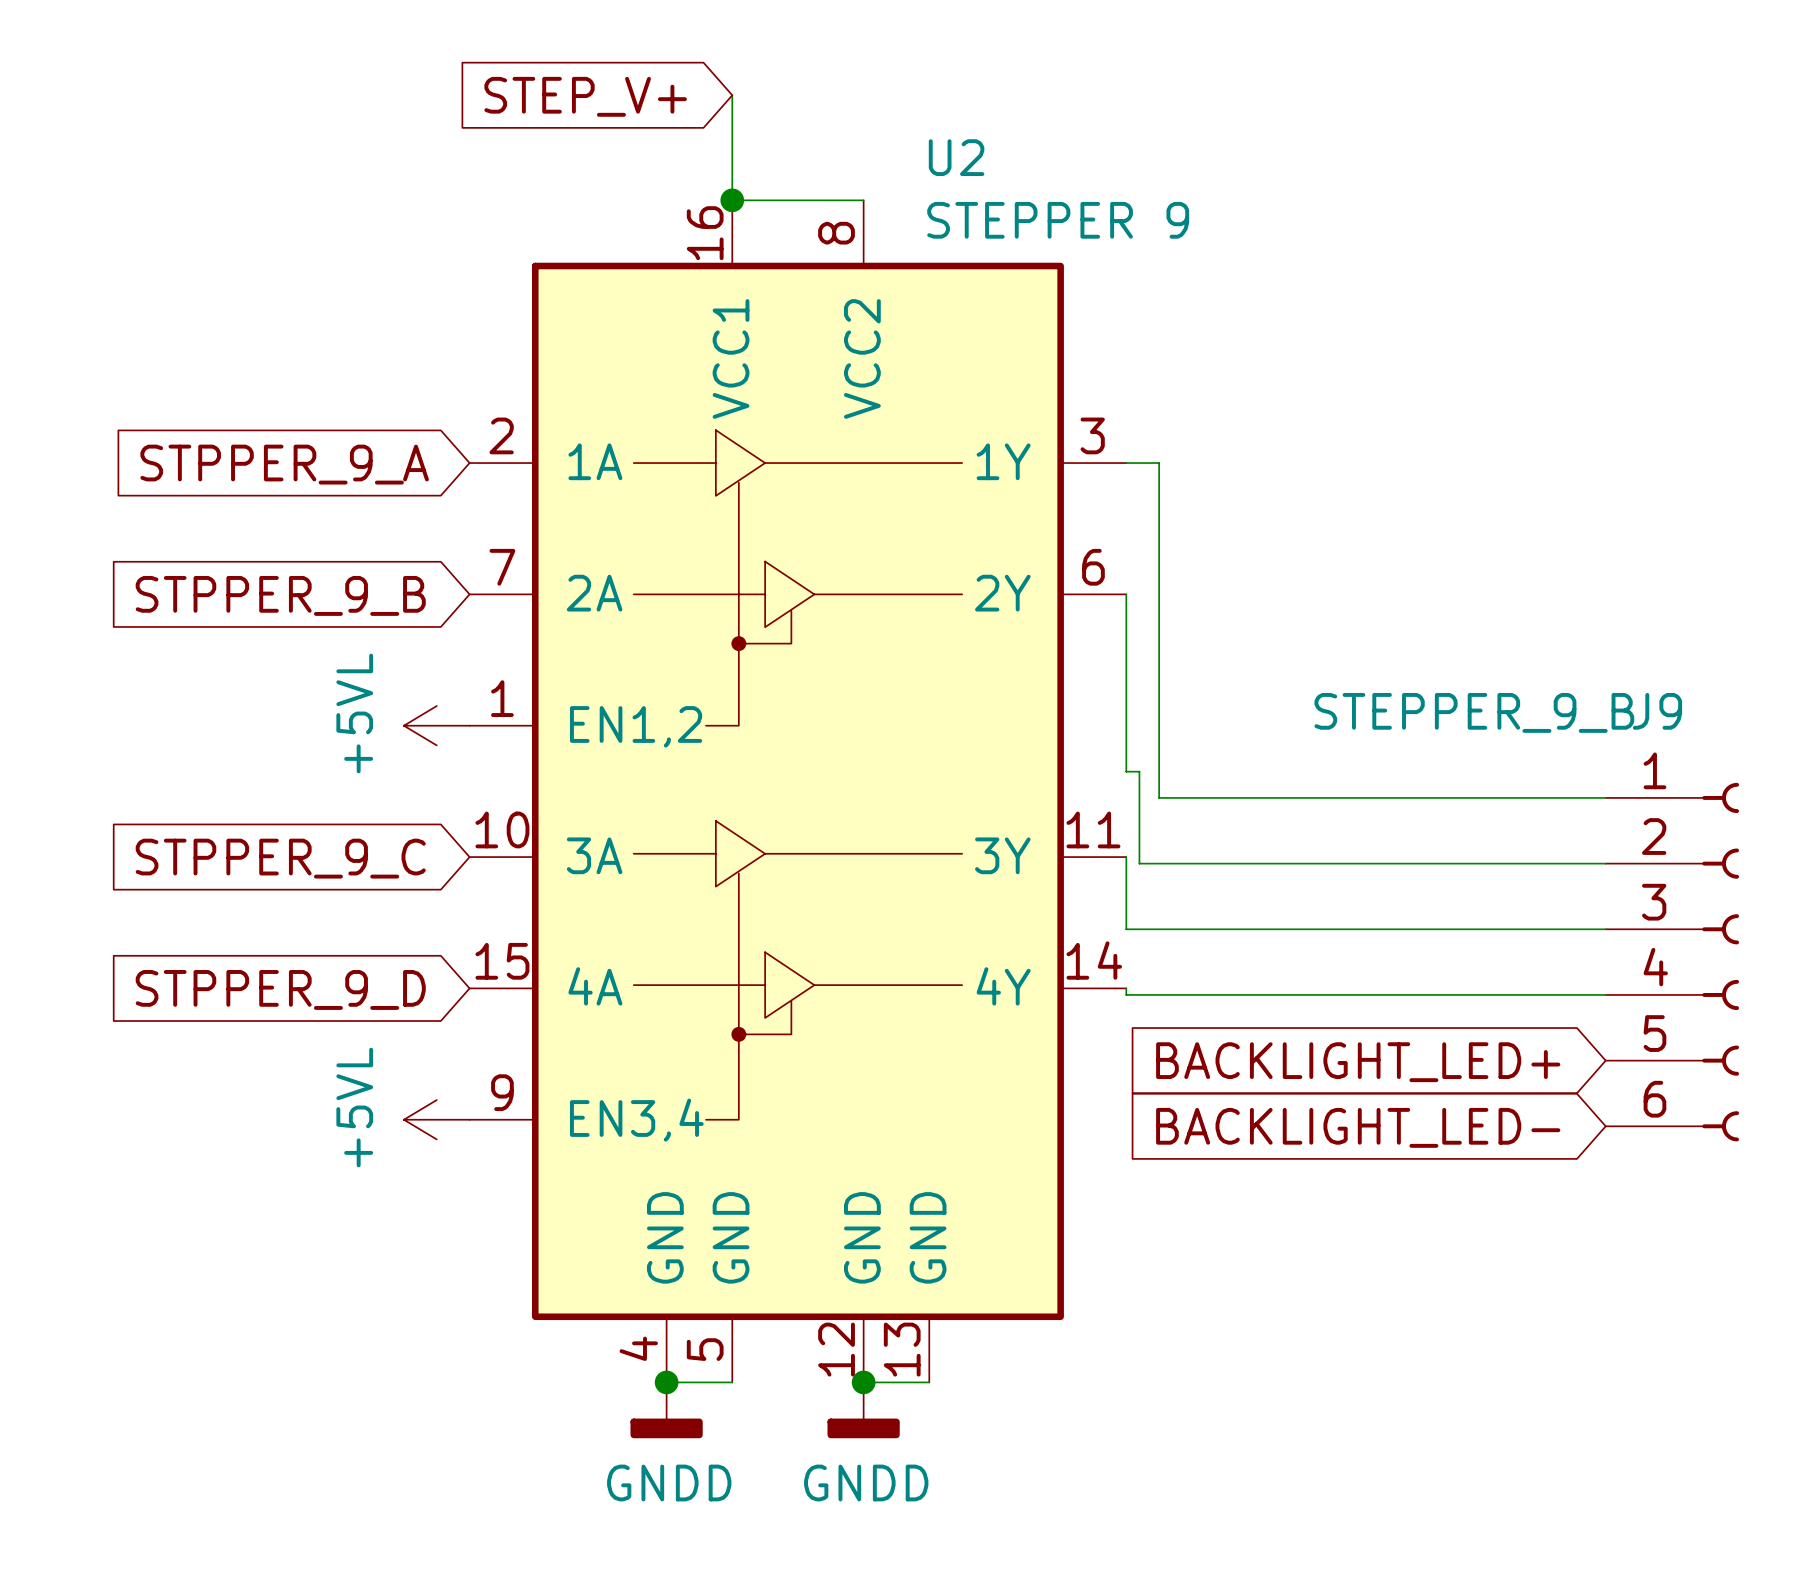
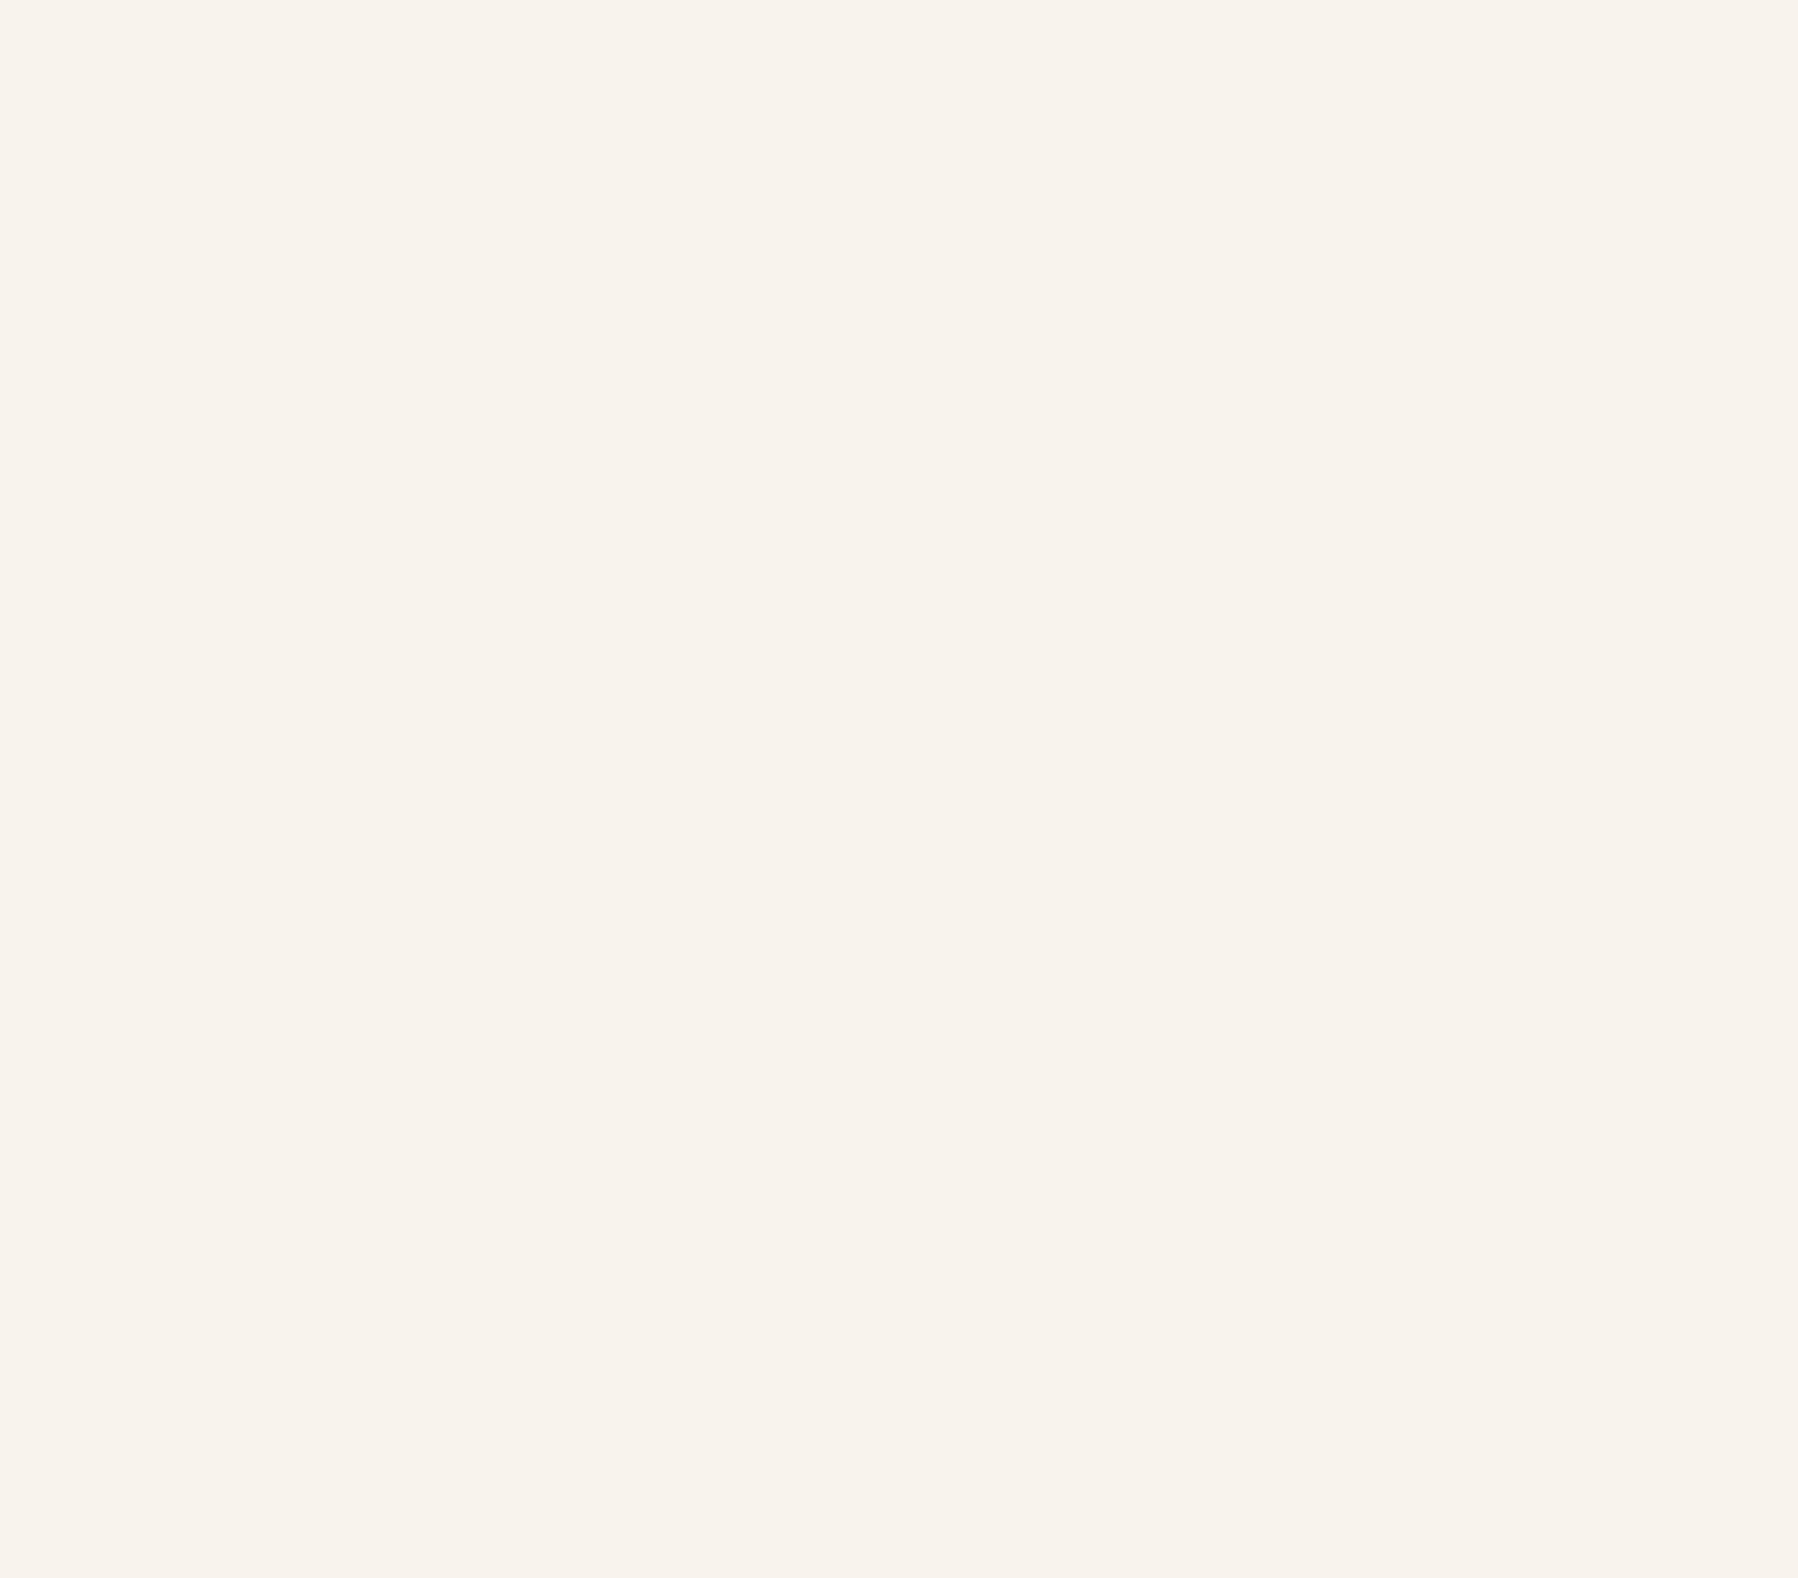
wire: (732, 95) (732, 200) (863, 200) -> none
global label: STEP_V+ (585, 96) -> none
junction: (732, 200) -> none
wire: (1126, 463) (1159, 463) (1159, 797) (1605, 797) -> none
global label: STPPER_9_A (284, 464) -> none
wire: (1126, 594) (1126, 771) (1139, 771) (1139, 863) (1605, 863) -> none
global label: STPPER_9_B (280, 595) -> none
power symbol: +5VL (436, 725) -> none
U2: STEPPER 9 (797, 791) -> none
wire: (1126, 857) (1126, 929) (1605, 929) -> none
global label: STPPER_9_C (280, 858) -> none
J9: STEPPER_9_B (1672, 962) -> none
wire: (1126, 988) (1126, 994) (1605, 994) -> none
global label: STPPER_9_D (280, 989) -> none
global label: BACKLIGHT_LED+ (1358, 1062) -> none
power symbol: +5VL (436, 1119) -> none
global label: BACKLIGHT_LED- (1358, 1127) -> none
wire: (666, 1382) (732, 1382) -> none
junction: (666, 1382) -> none
wire: (863, 1382) (929, 1382) -> none
junction: (863, 1382) -> none
power symbol: GNDD (666, 1410) -> none
power symbol: GNDD (863, 1410) -> none

